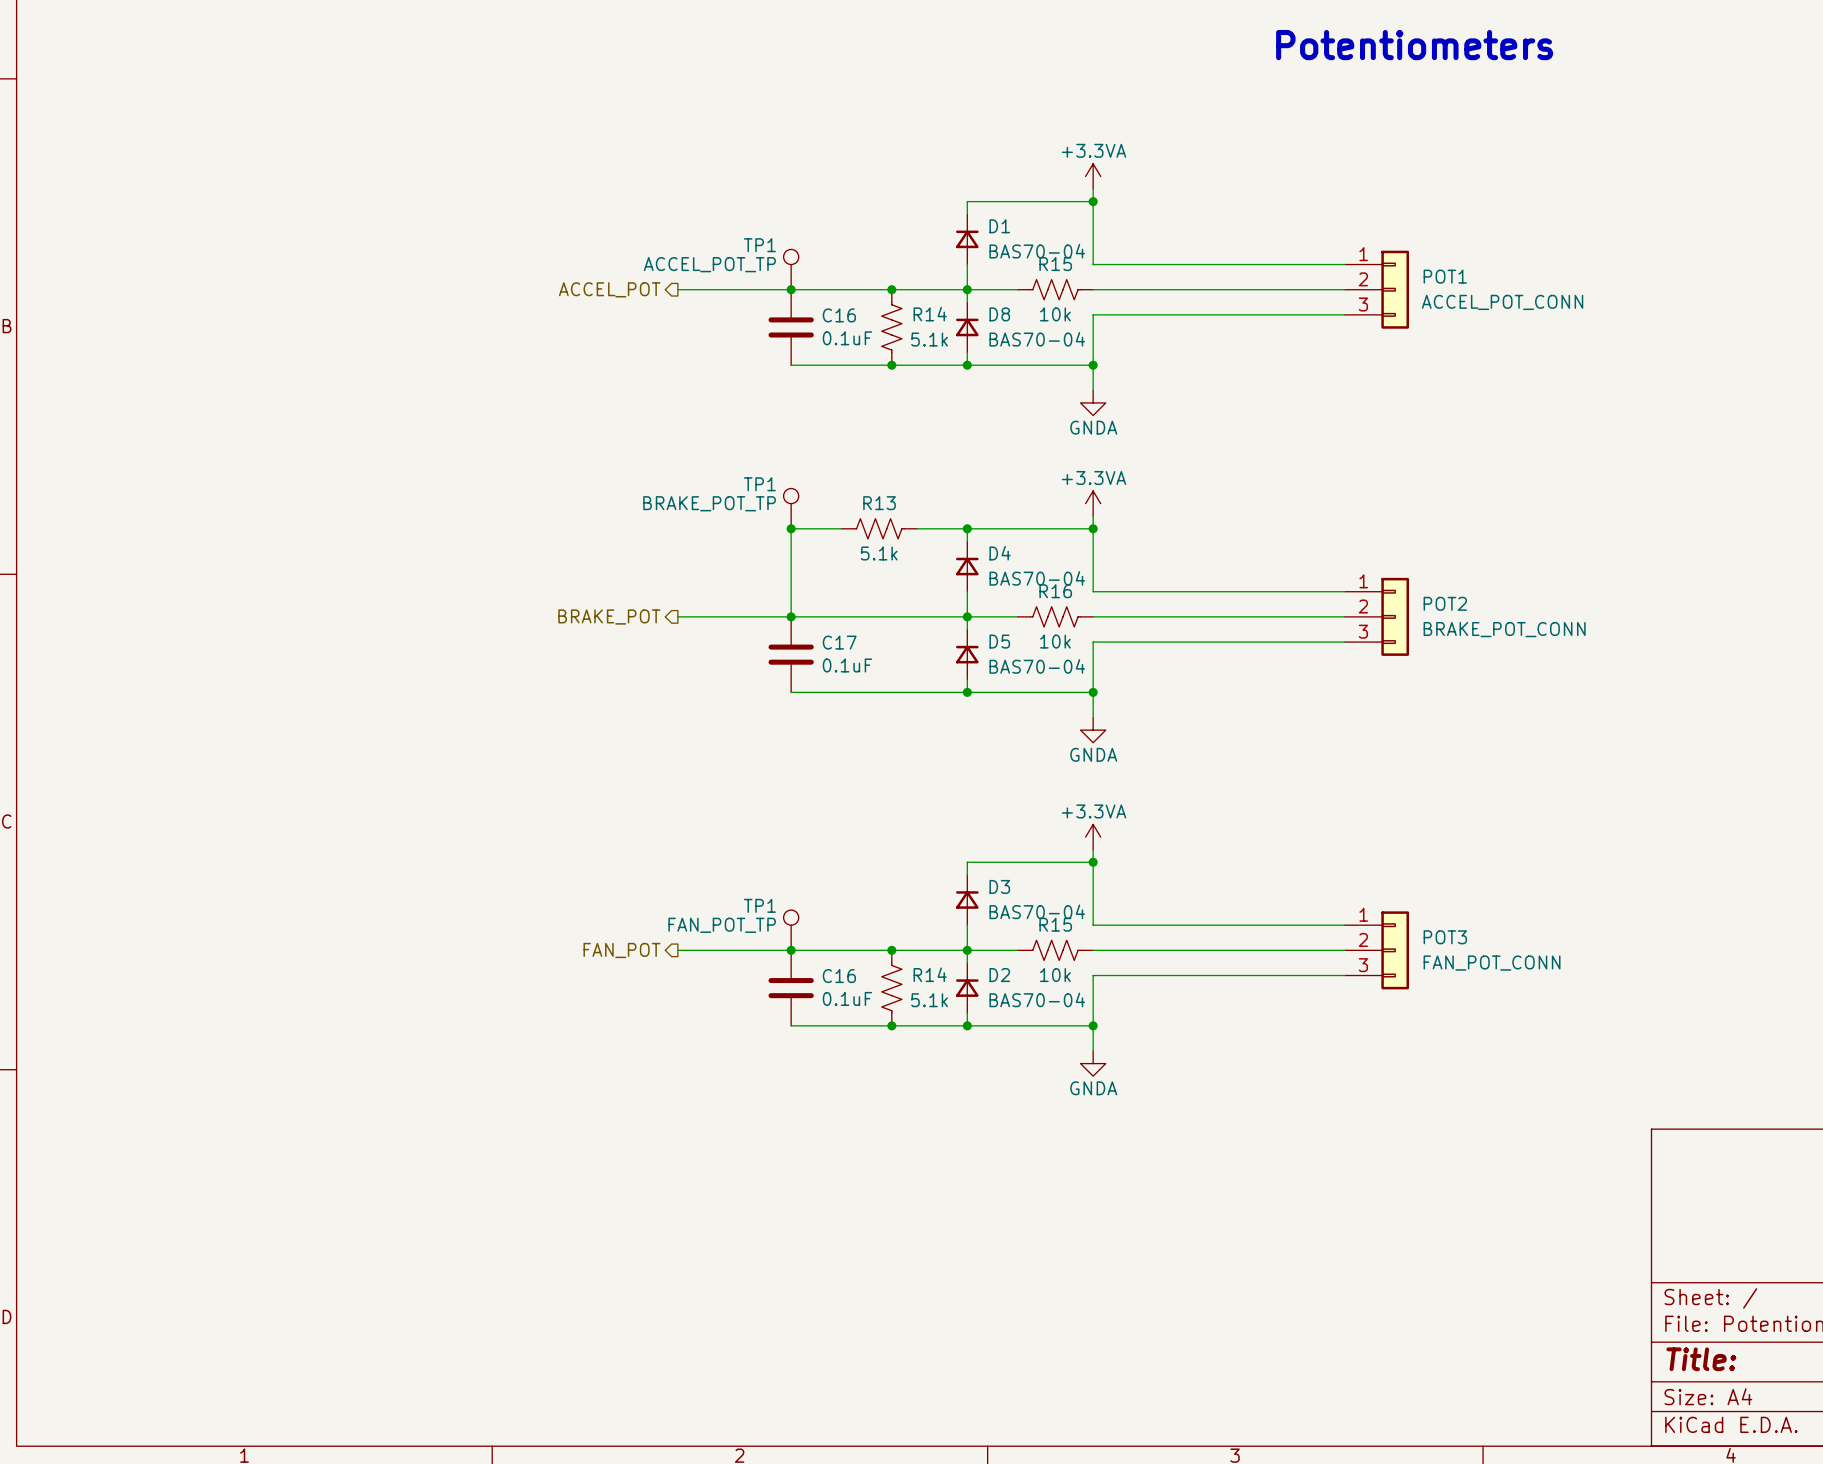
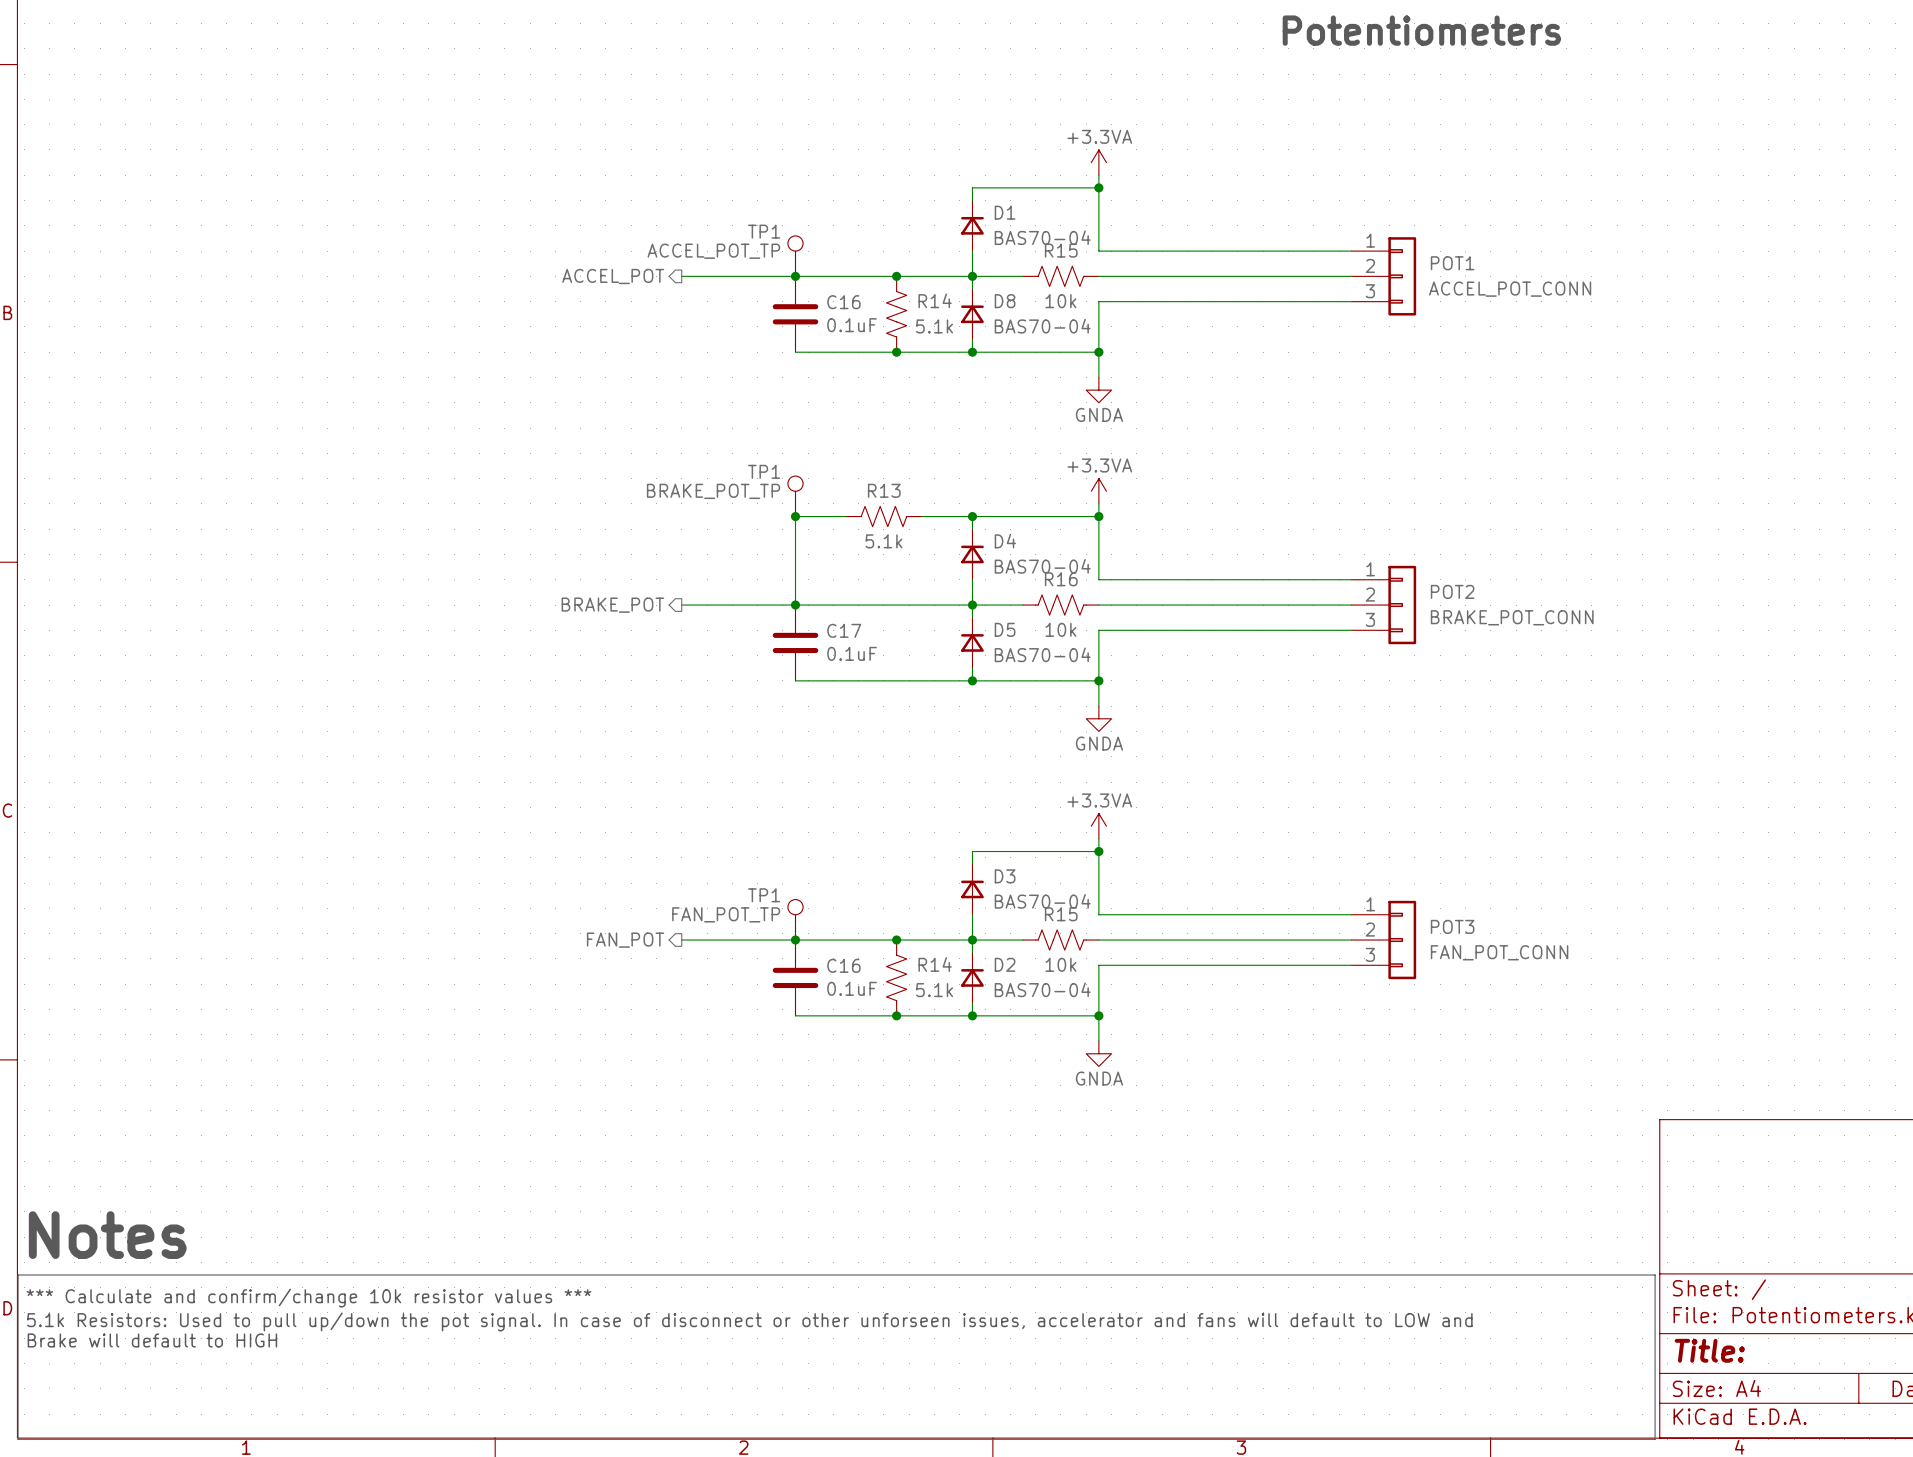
text: none -> Notes (107, 1235)
line: none -> (18, 1274) (1655, 1274) (1655, 1439) (18, 1439) (18, 1274)
text: none -> *** Calculate and confirm/change 10k resistor values *** (308, 1298)
text: none -> 5.1k Resistors: Used to pull up/down the pot signal. In case of disconnect or other unforseen issues, accelerator and fans will default to LOW and (749, 1321)
text: none -> Brake will default to HIGH (152, 1340)

